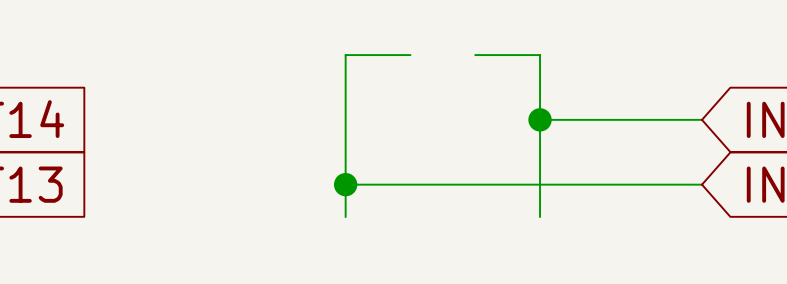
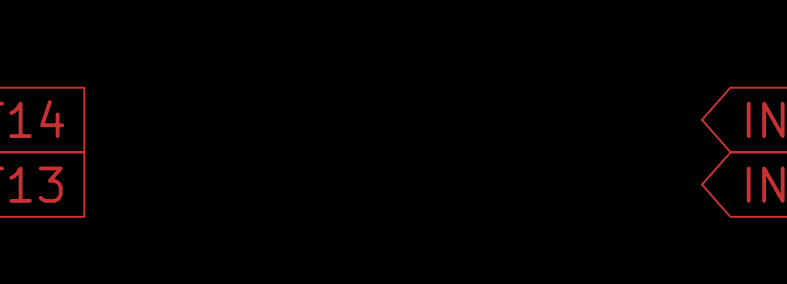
wire: (410, 55) (345, 55) (345, 217) -> none
wire: (475, 55) (540, 55) (540, 217) -> none
wire: (540, 119) (702, 119) -> none
junction: (540, 119) -> none
wire: (345, 184) (702, 184) -> none
junction: (345, 184) -> none

